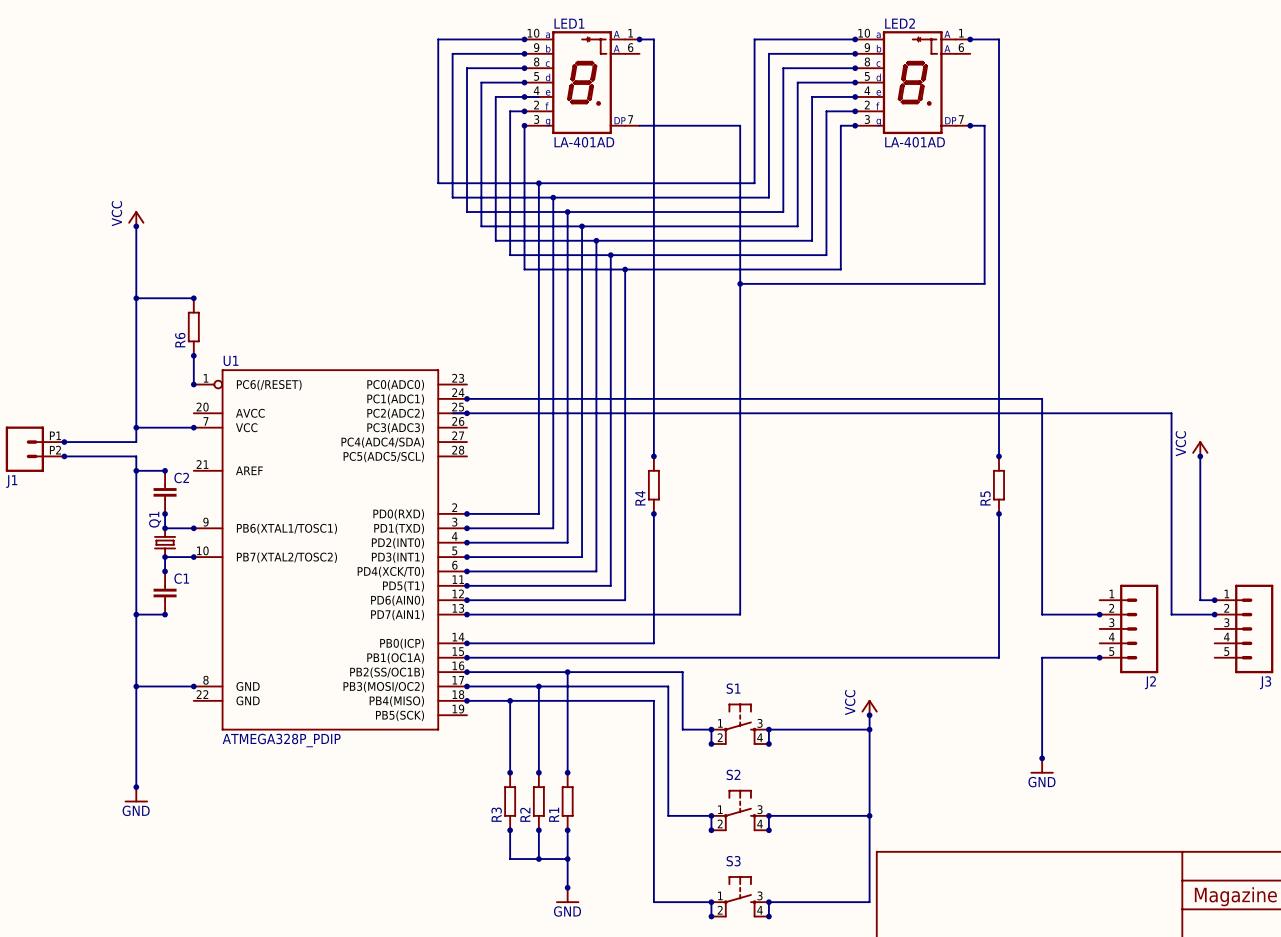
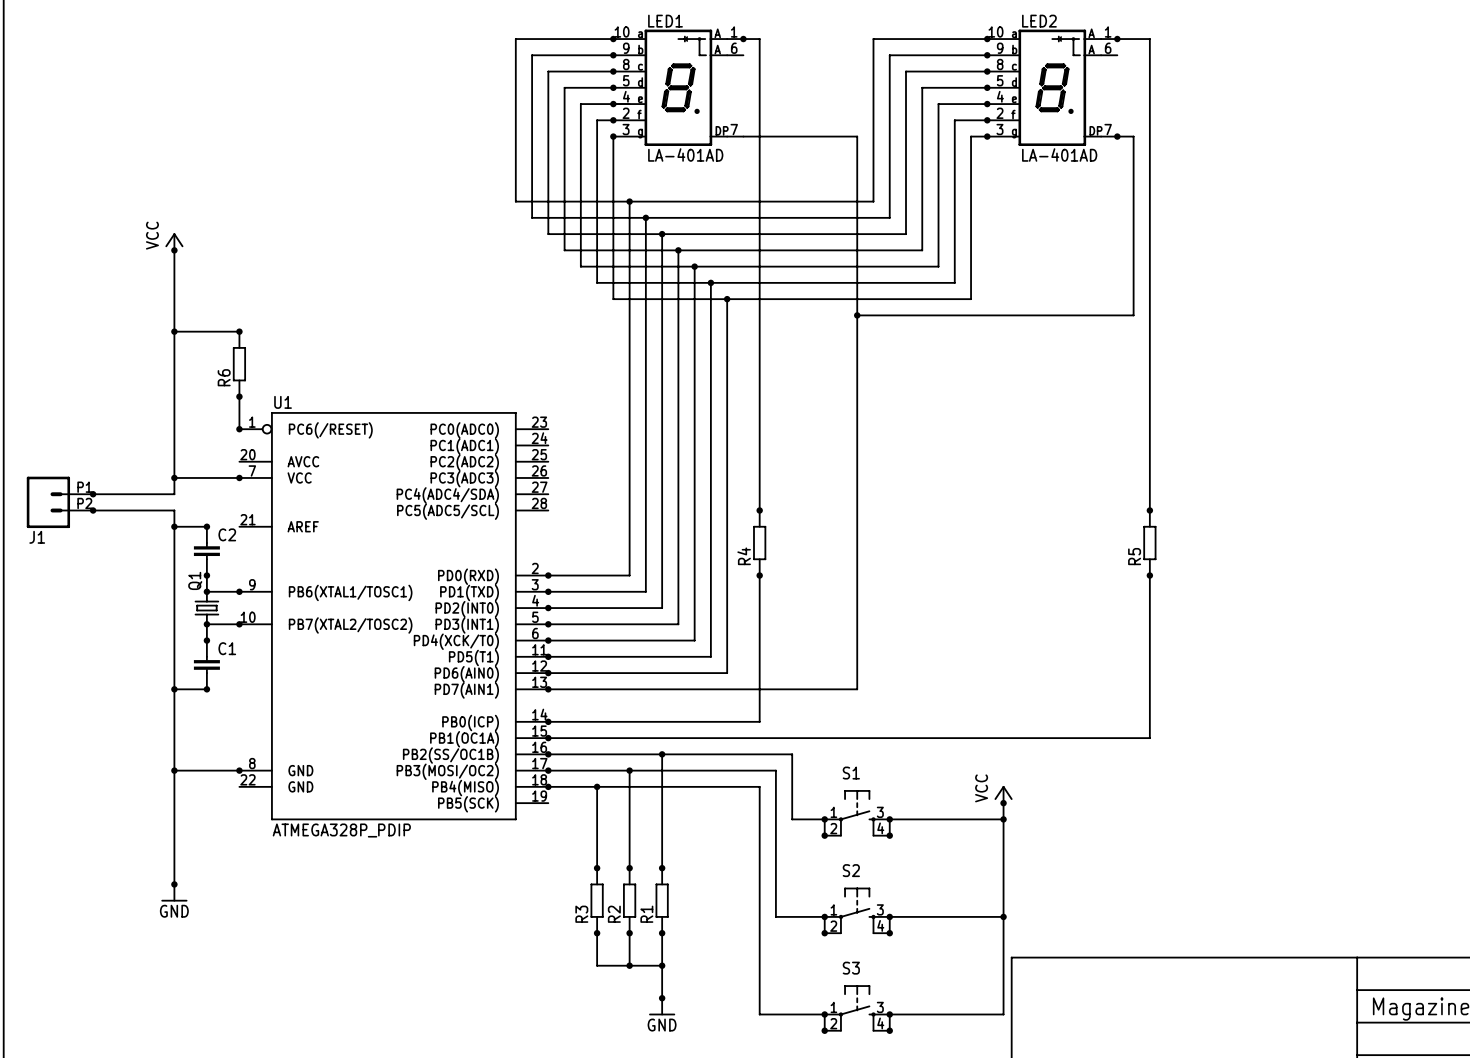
wire: (467, 398) (1042, 398) (1042, 614) (1099, 614) -> none
junction: (467, 398) -> none
wire: (452, 413) (1171, 413) (1171, 614) (1214, 614) -> none
junction: (467, 413) -> none
power symbol: VCC (1200, 448) -> none
wire: (1200, 456) (1200, 600) (1214, 600) -> none
junction: (1200, 456) -> none
junction: (1214, 600) -> none
junction: (1099, 614) -> none
junction: (1214, 614) -> none
J2: (1128, 628) -> none
J3: (1244, 628) -> none
wire: (1099, 657) (1042, 657) (1042, 758) -> none
junction: (1099, 657) -> none
junction: (1042, 758) -> none
power symbol: GND (1042, 765) -> none

